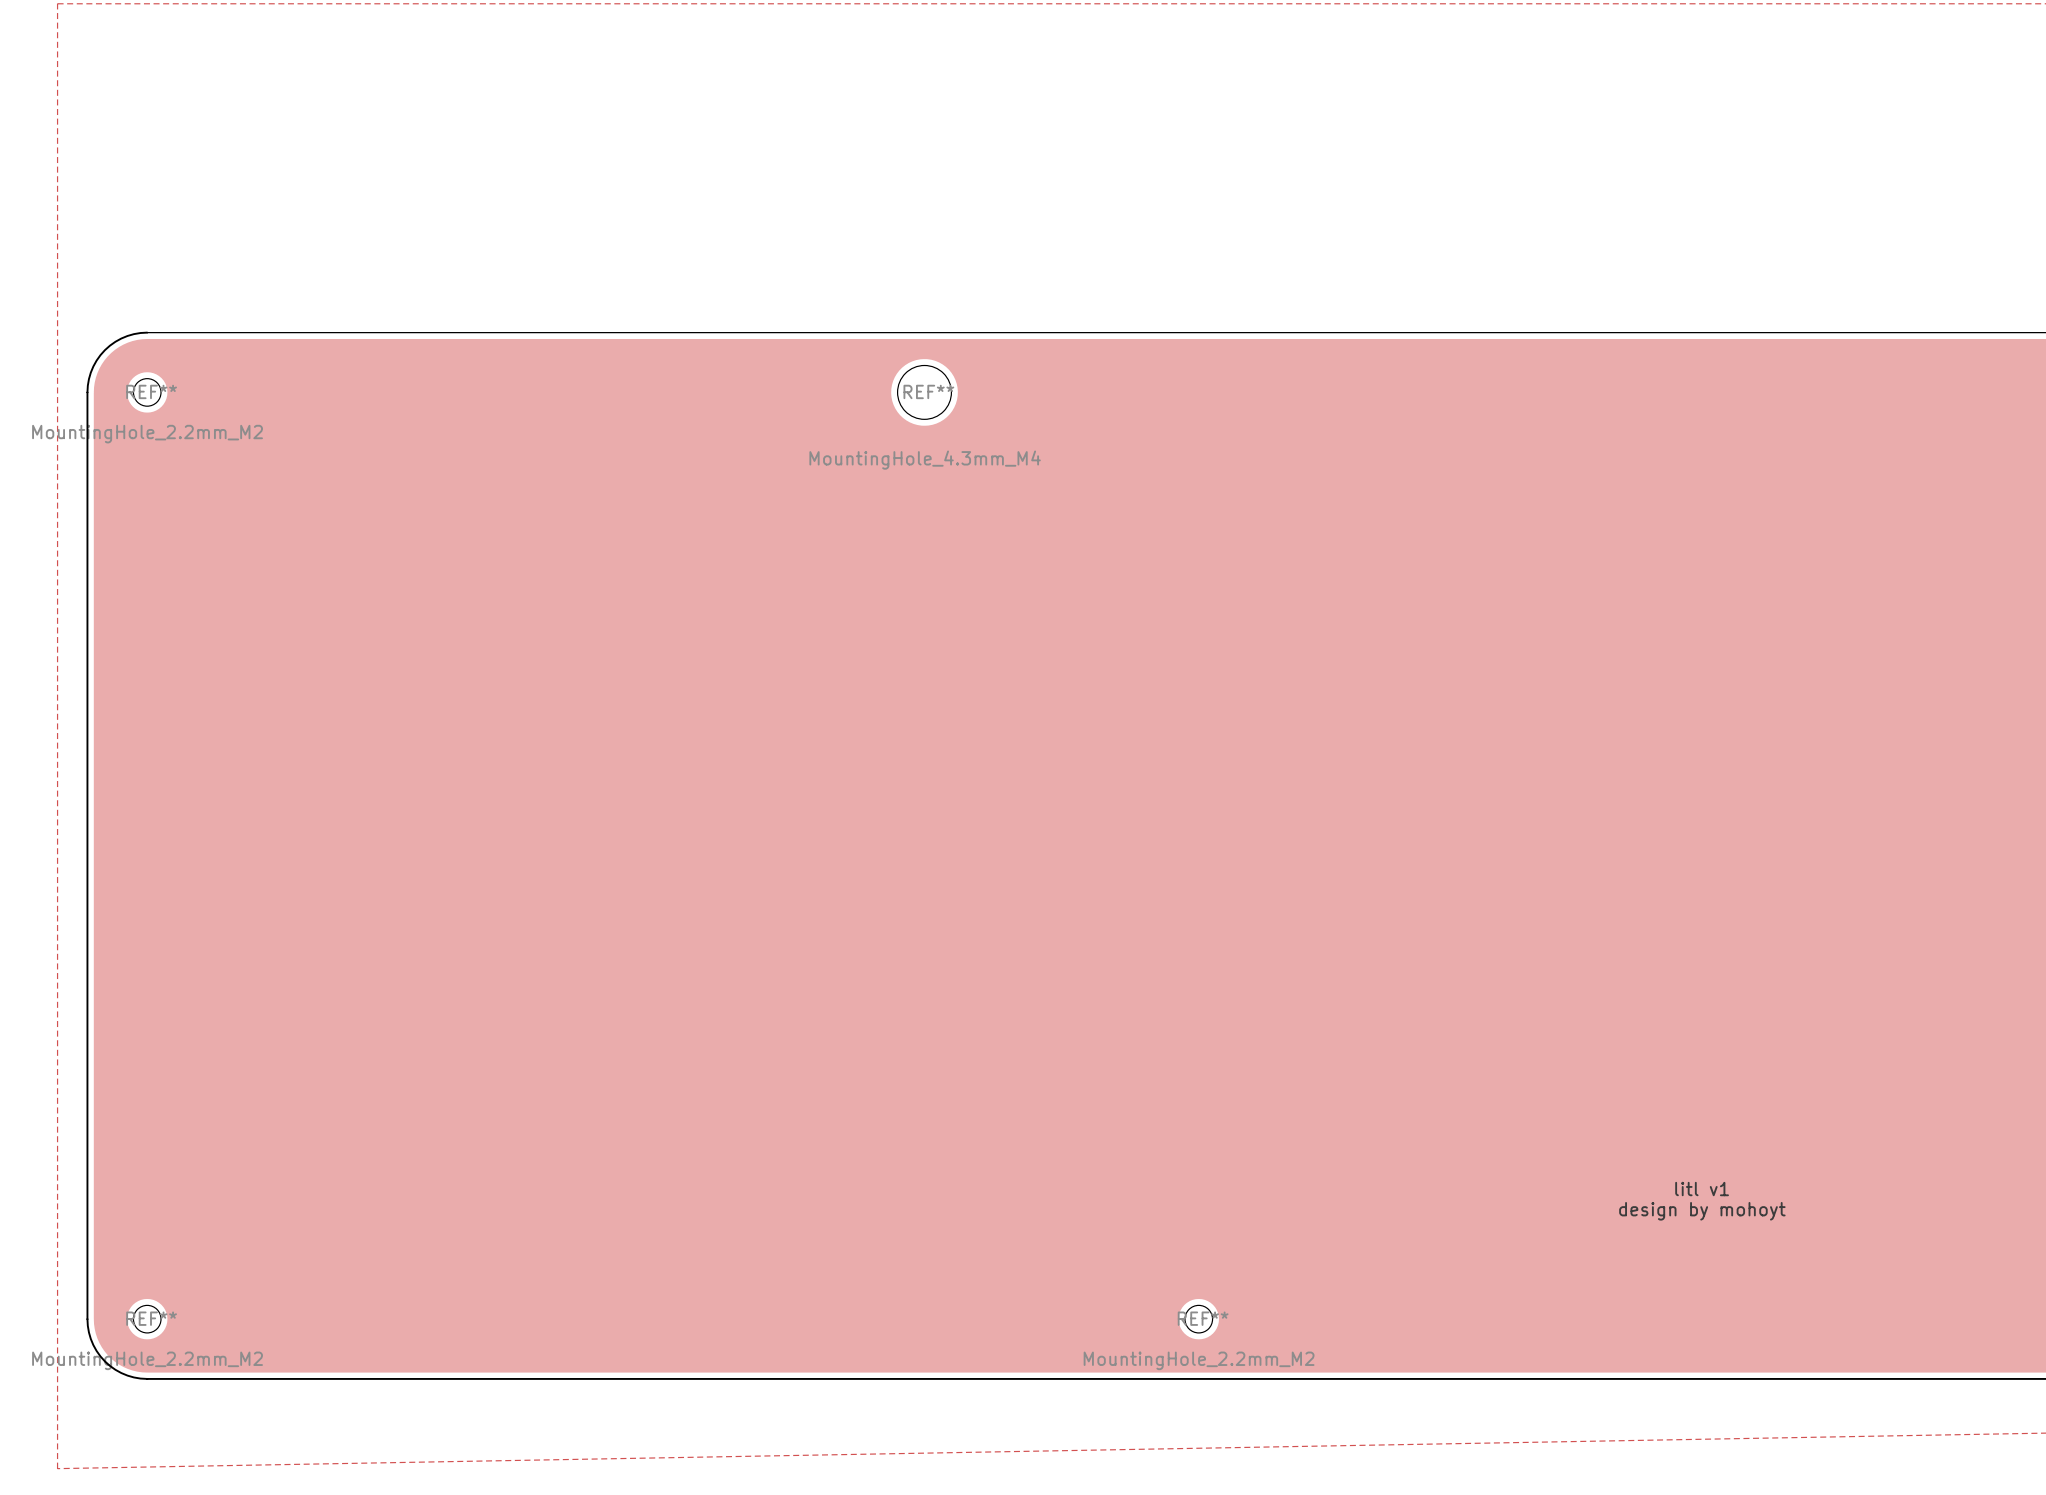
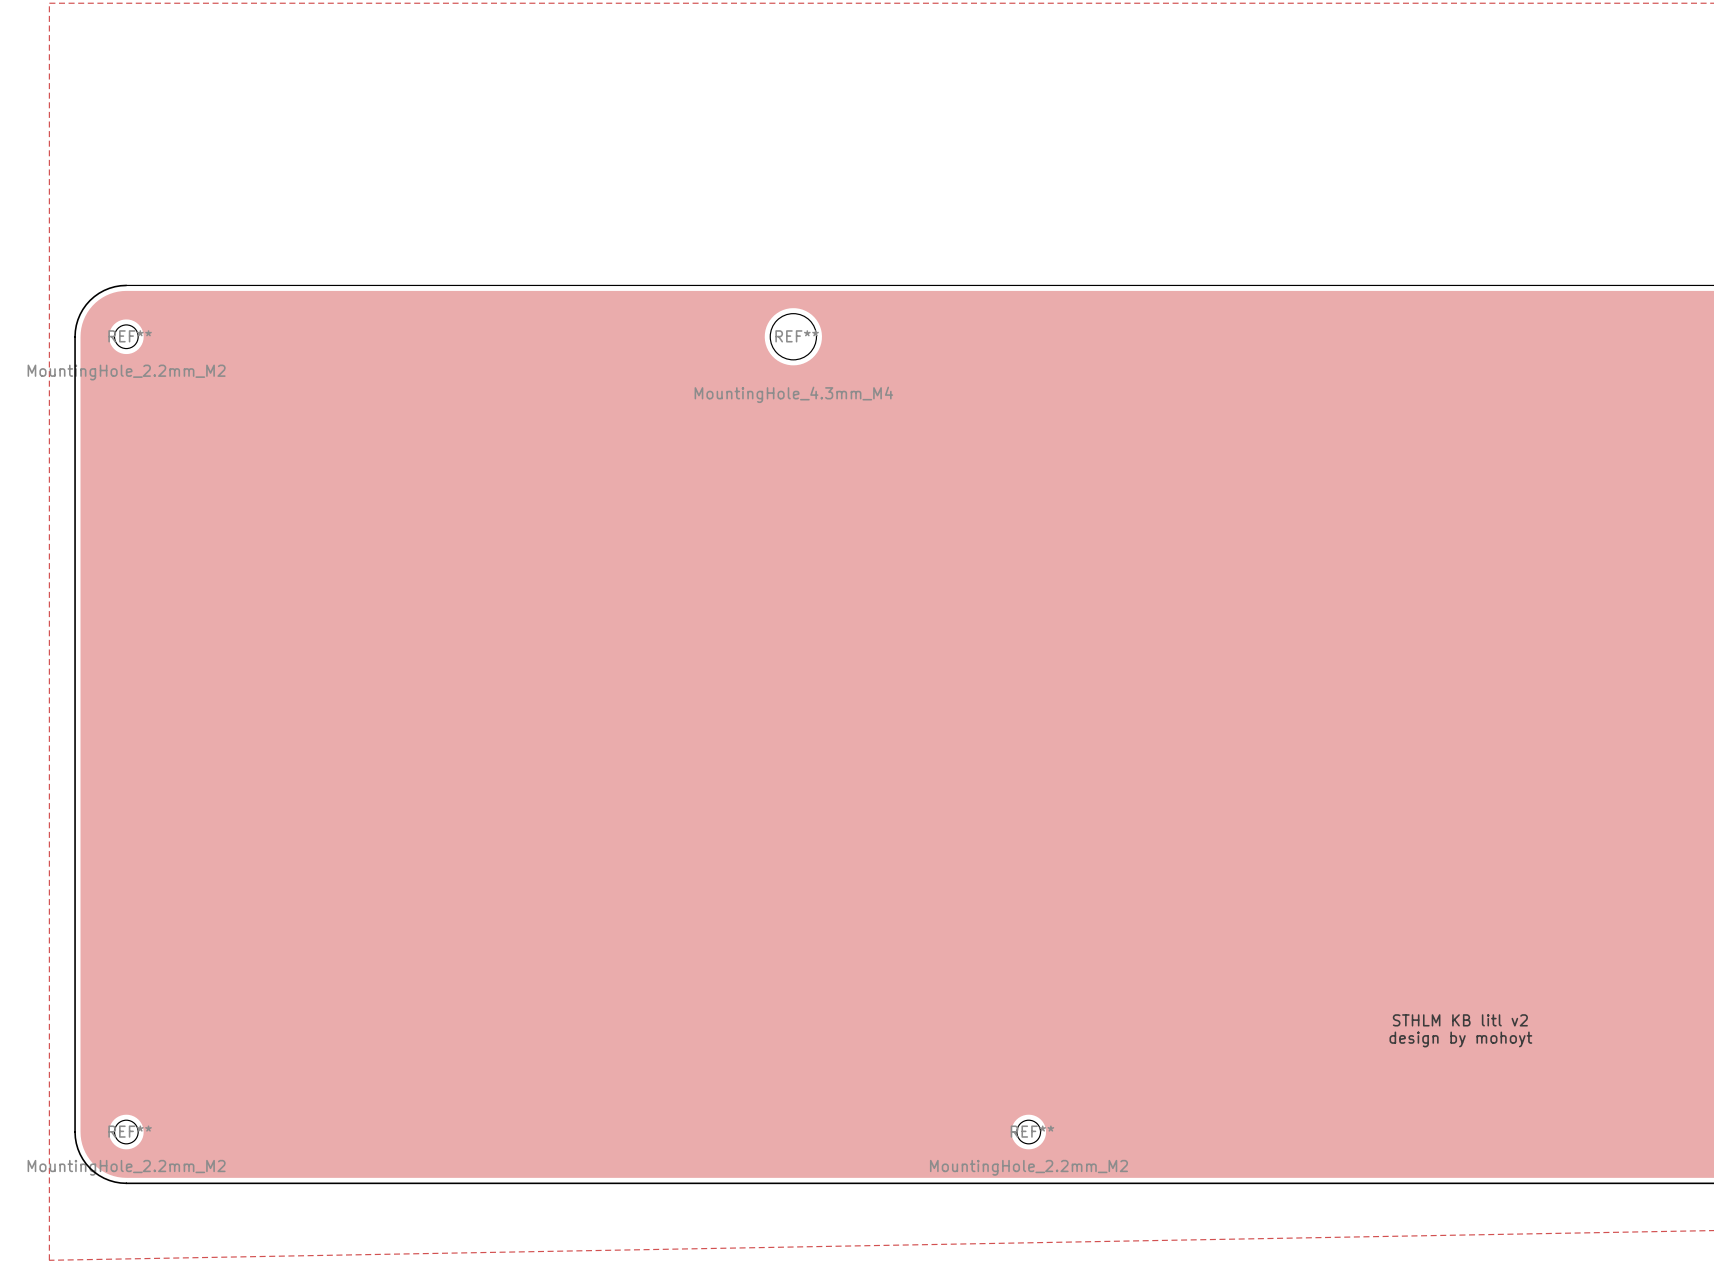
text: litl v1 (1702, 1189) -> STHLM KB litl v2 (1460, 1020)

